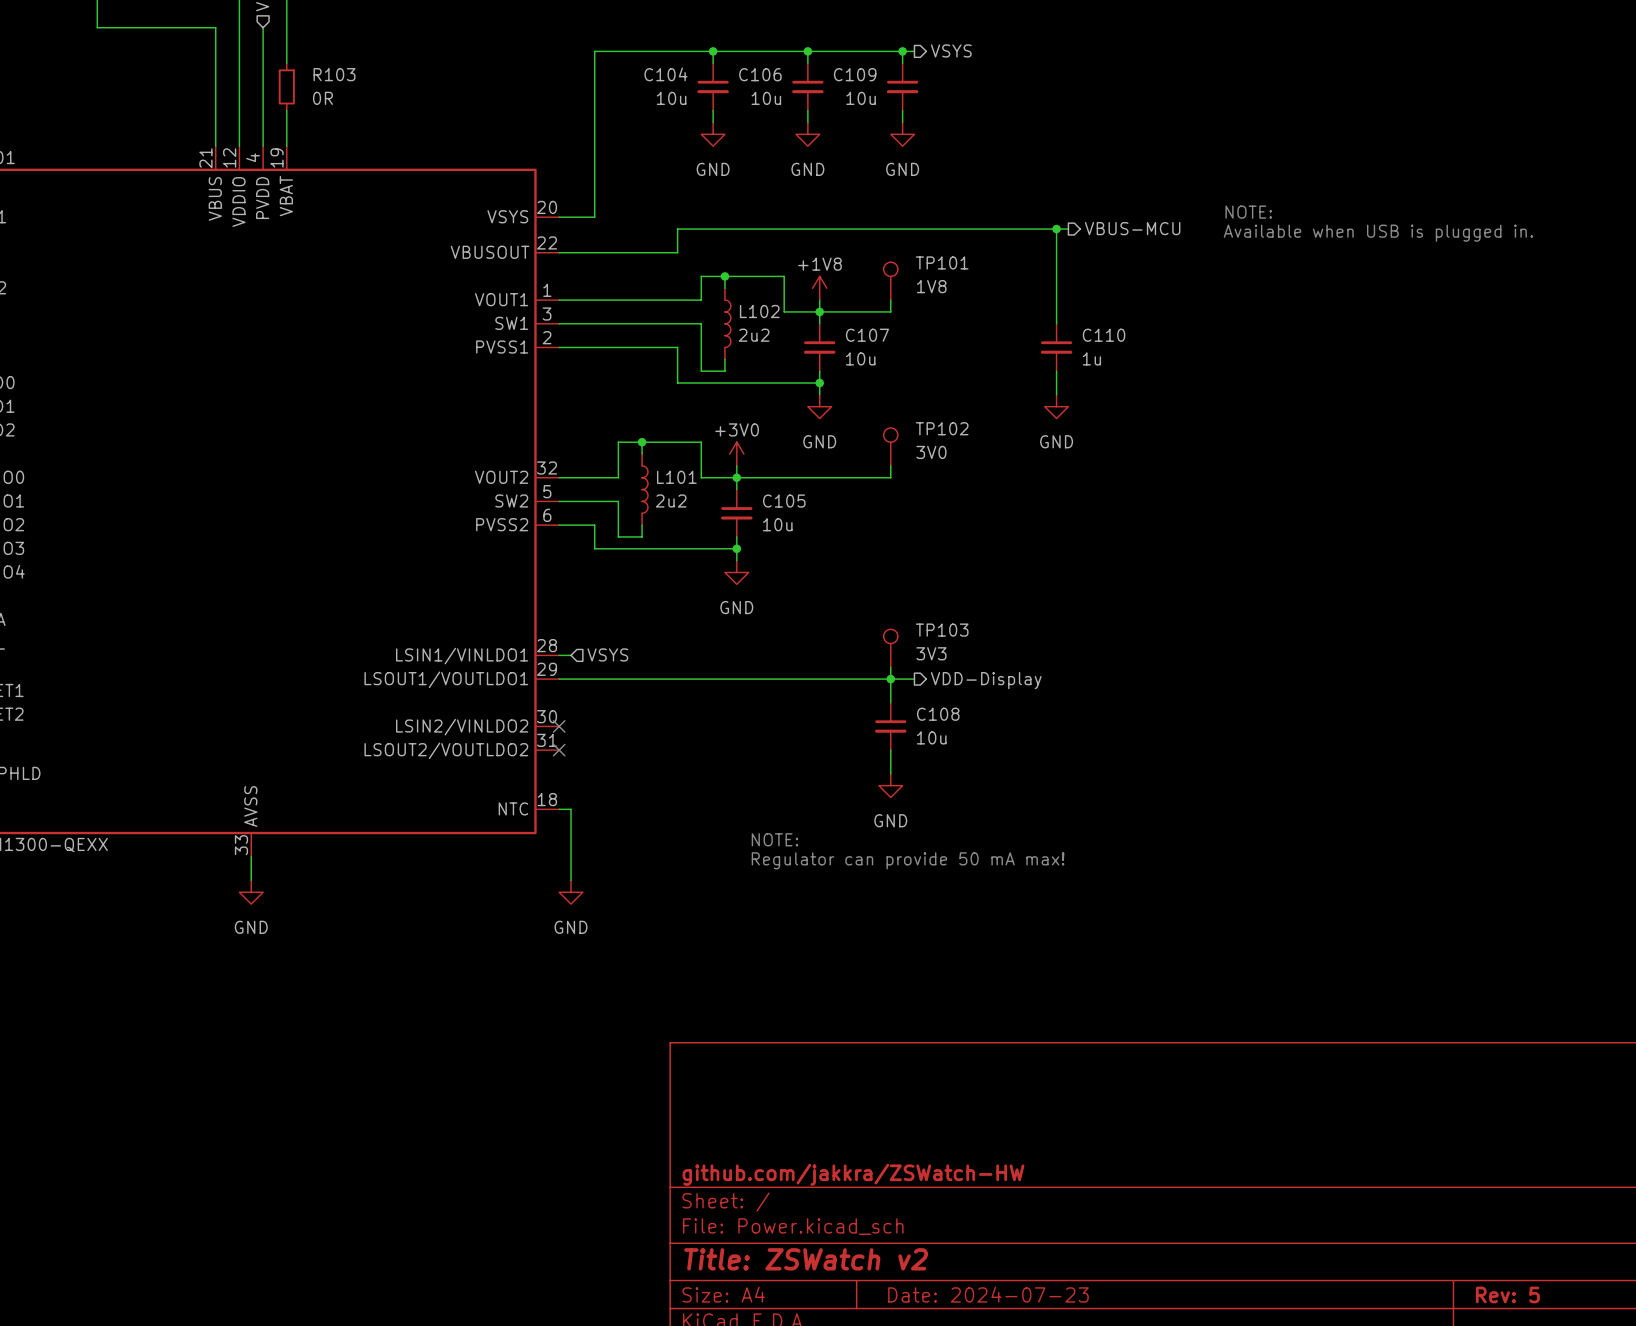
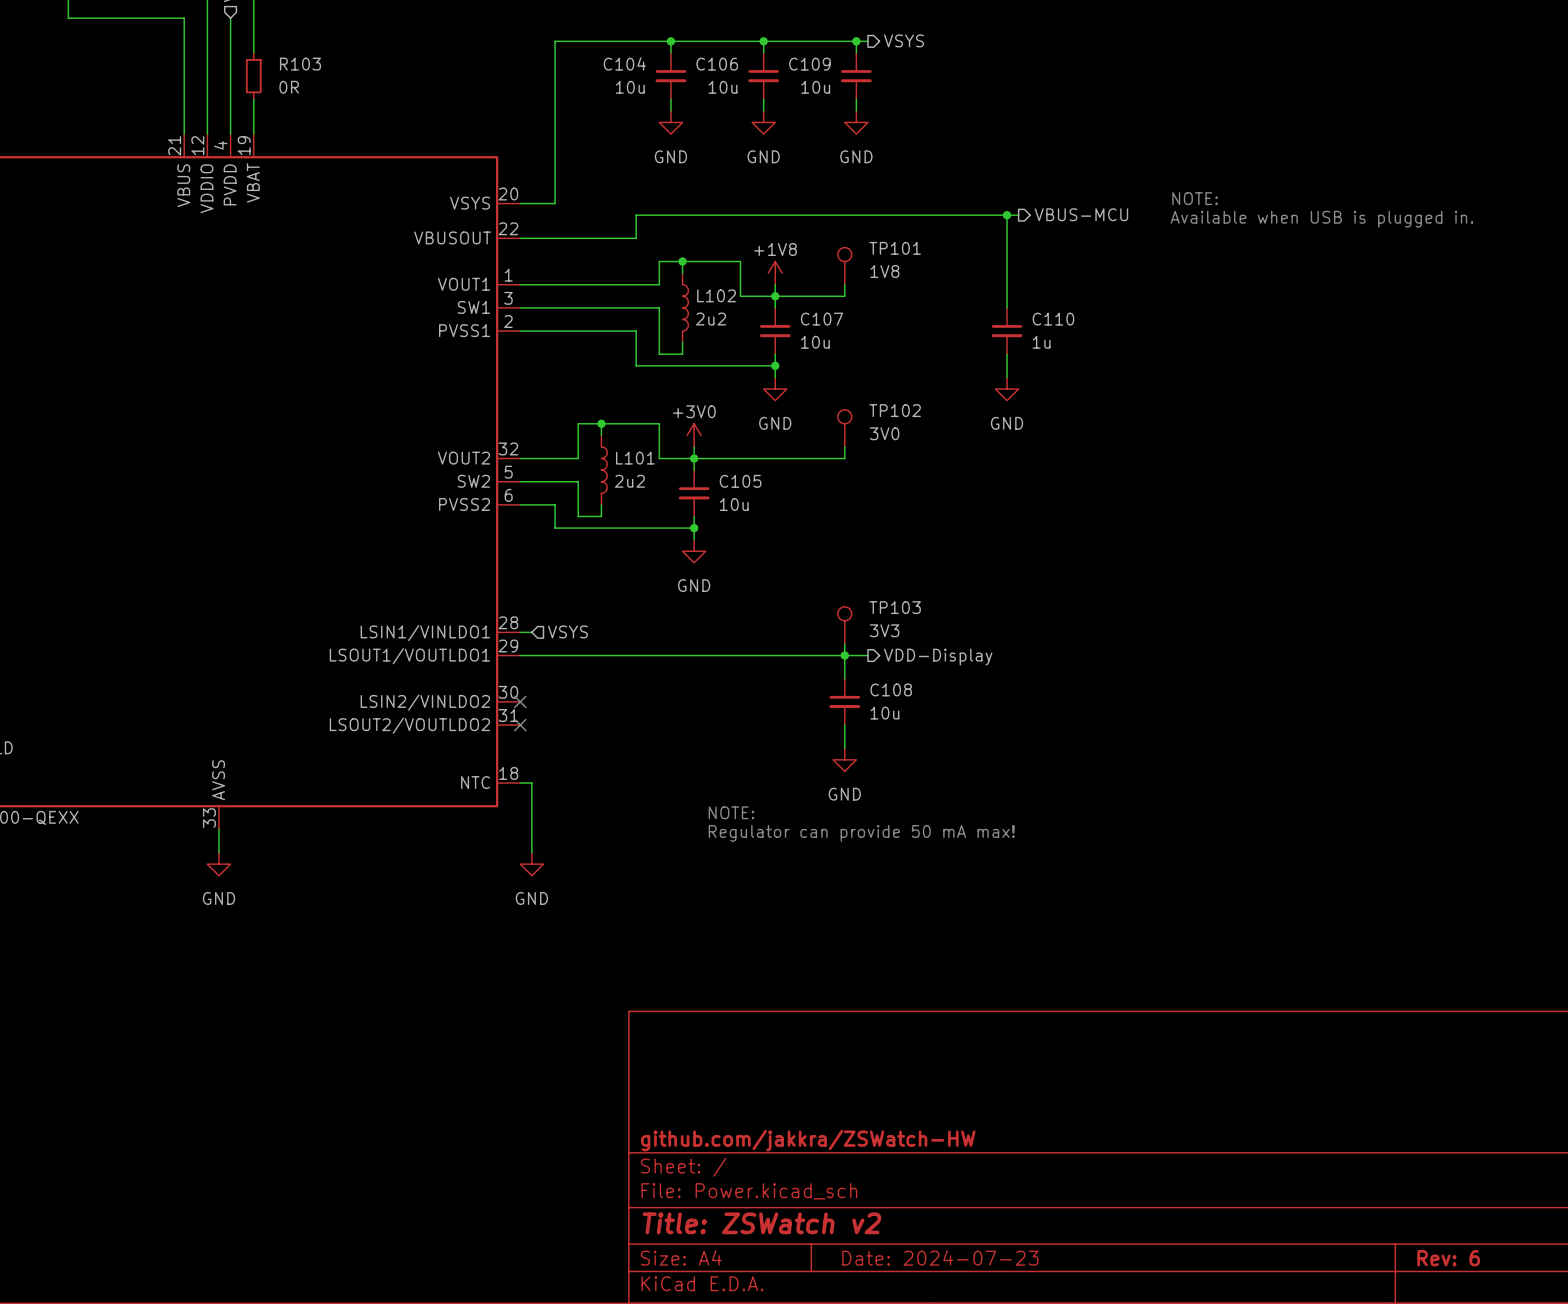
title block: Rev: 5 (1507, 1294) -> Rev: 6 (1448, 1258)

